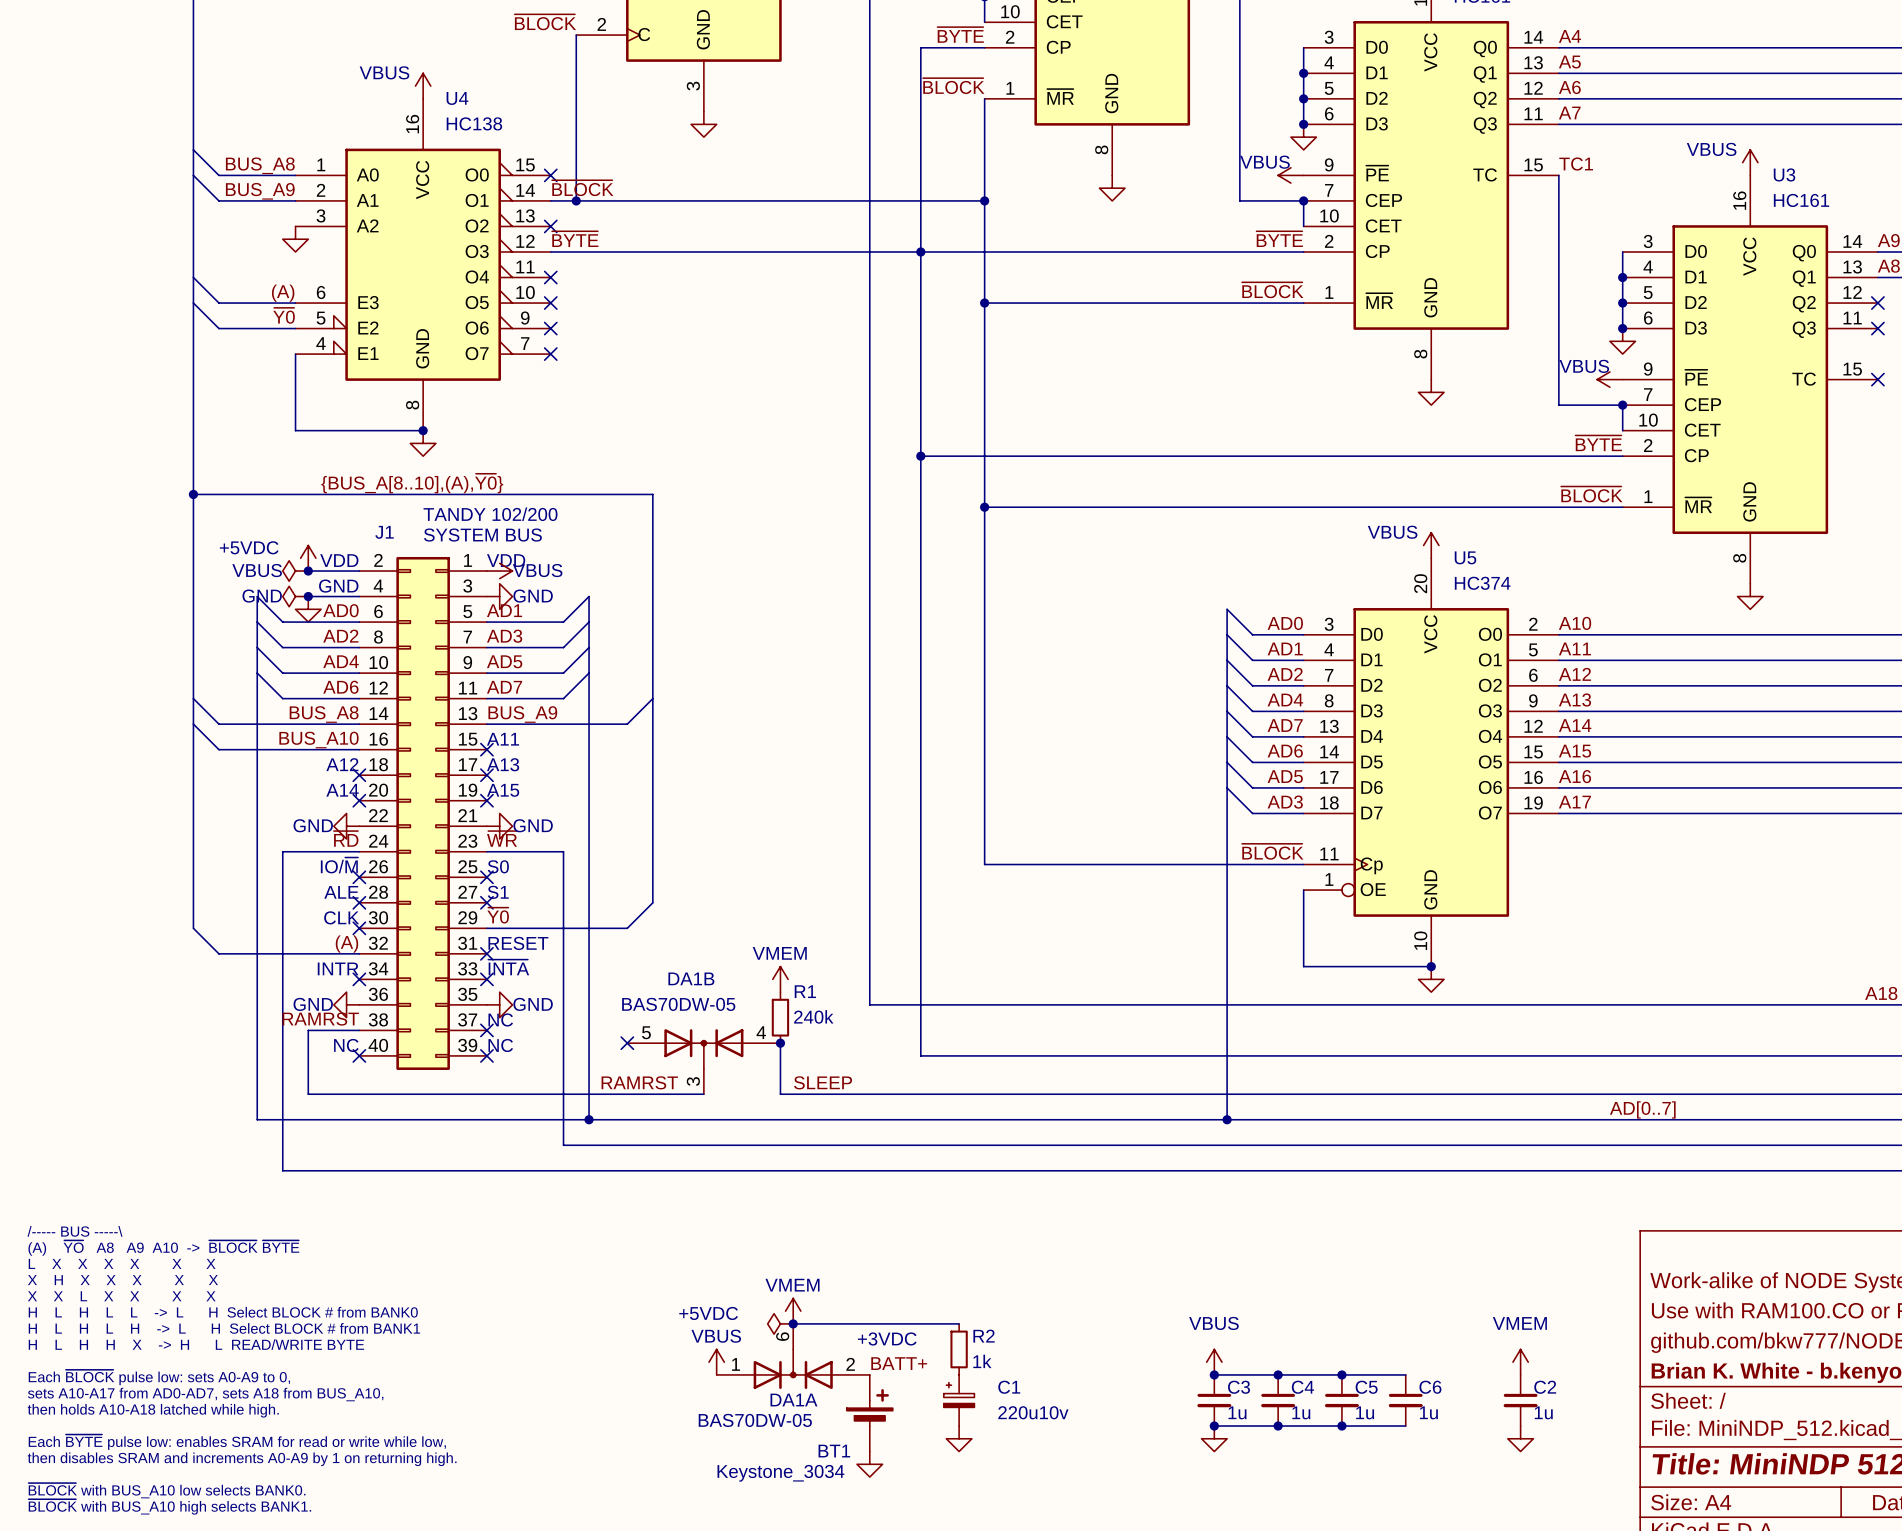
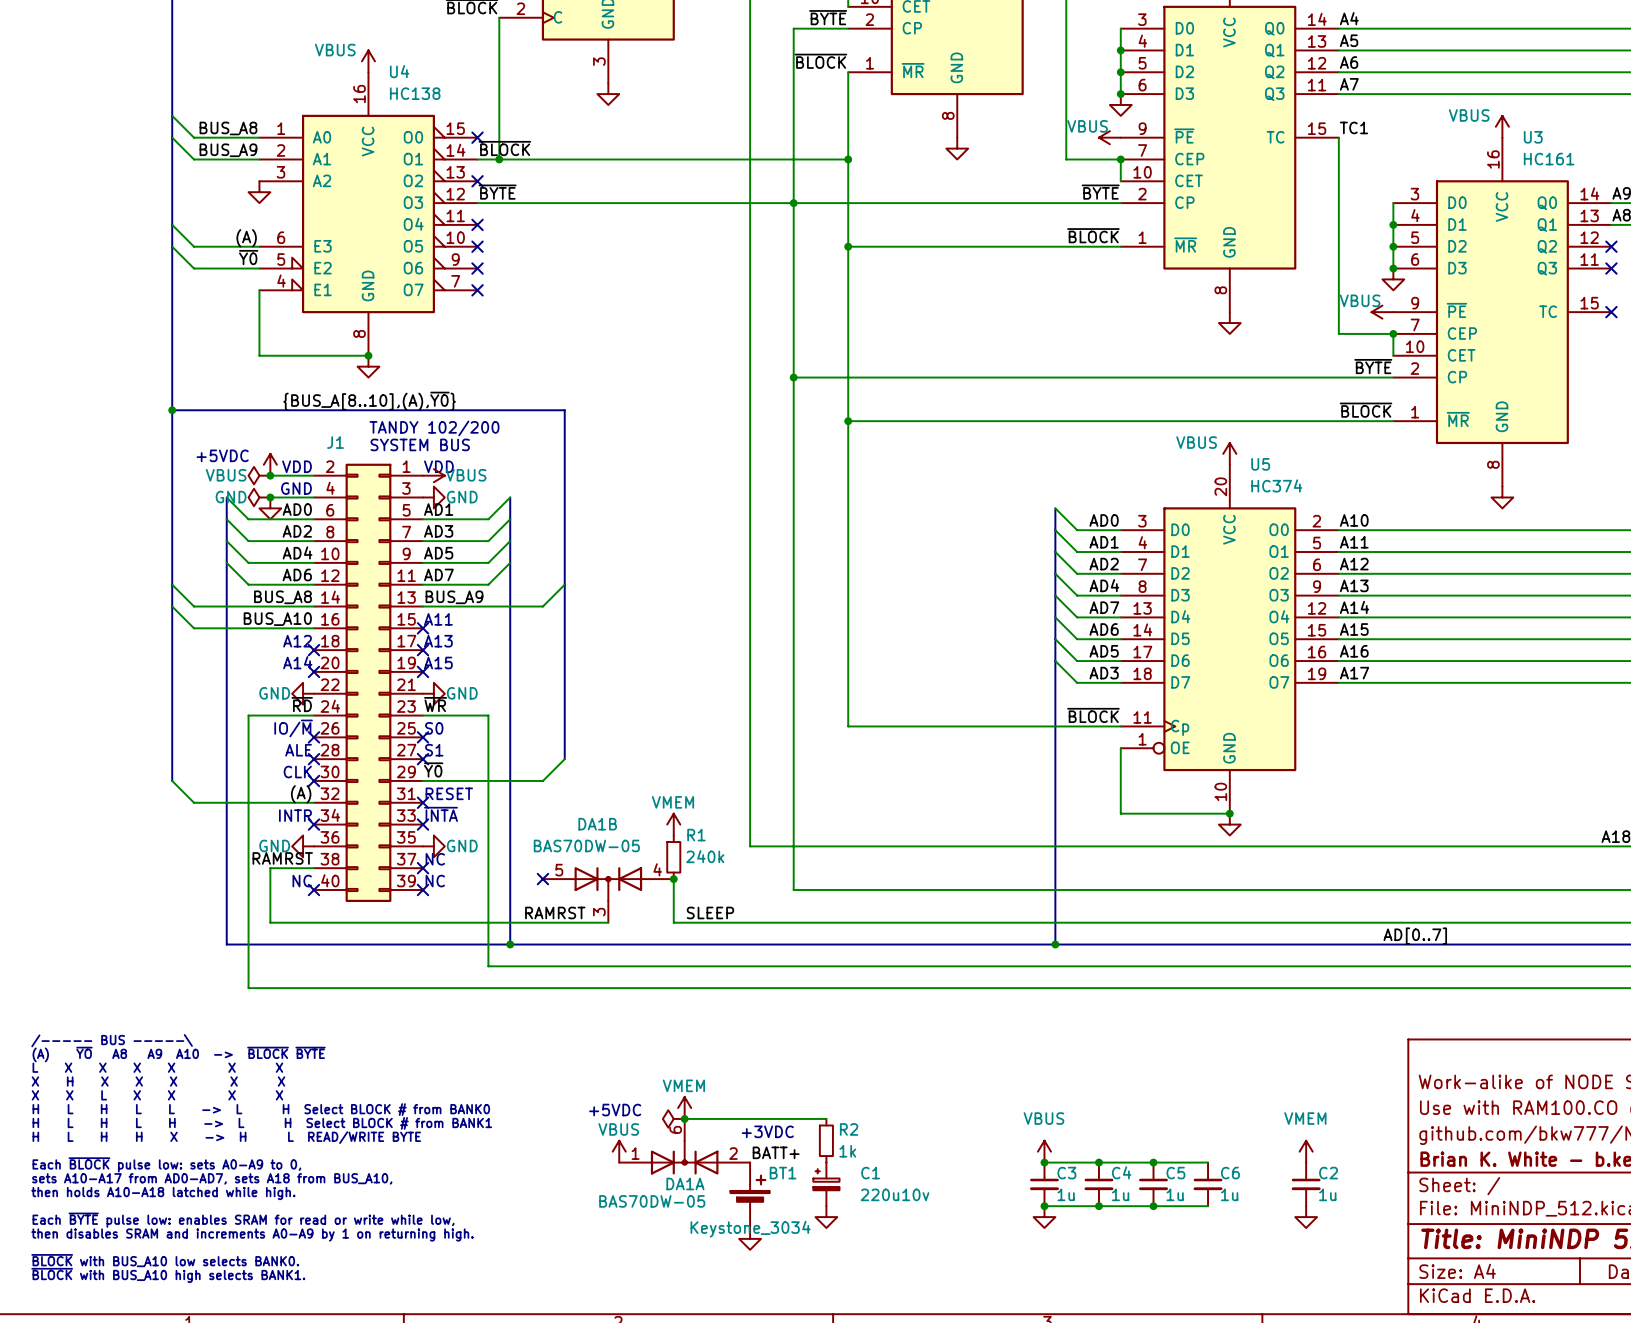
BT1 name position: BT1 (834, 1451) -> BT1 (783, 1173)
BT1 value position: Keystone_3034 (780, 1473) -> Keystone_3034 (750, 1229)

